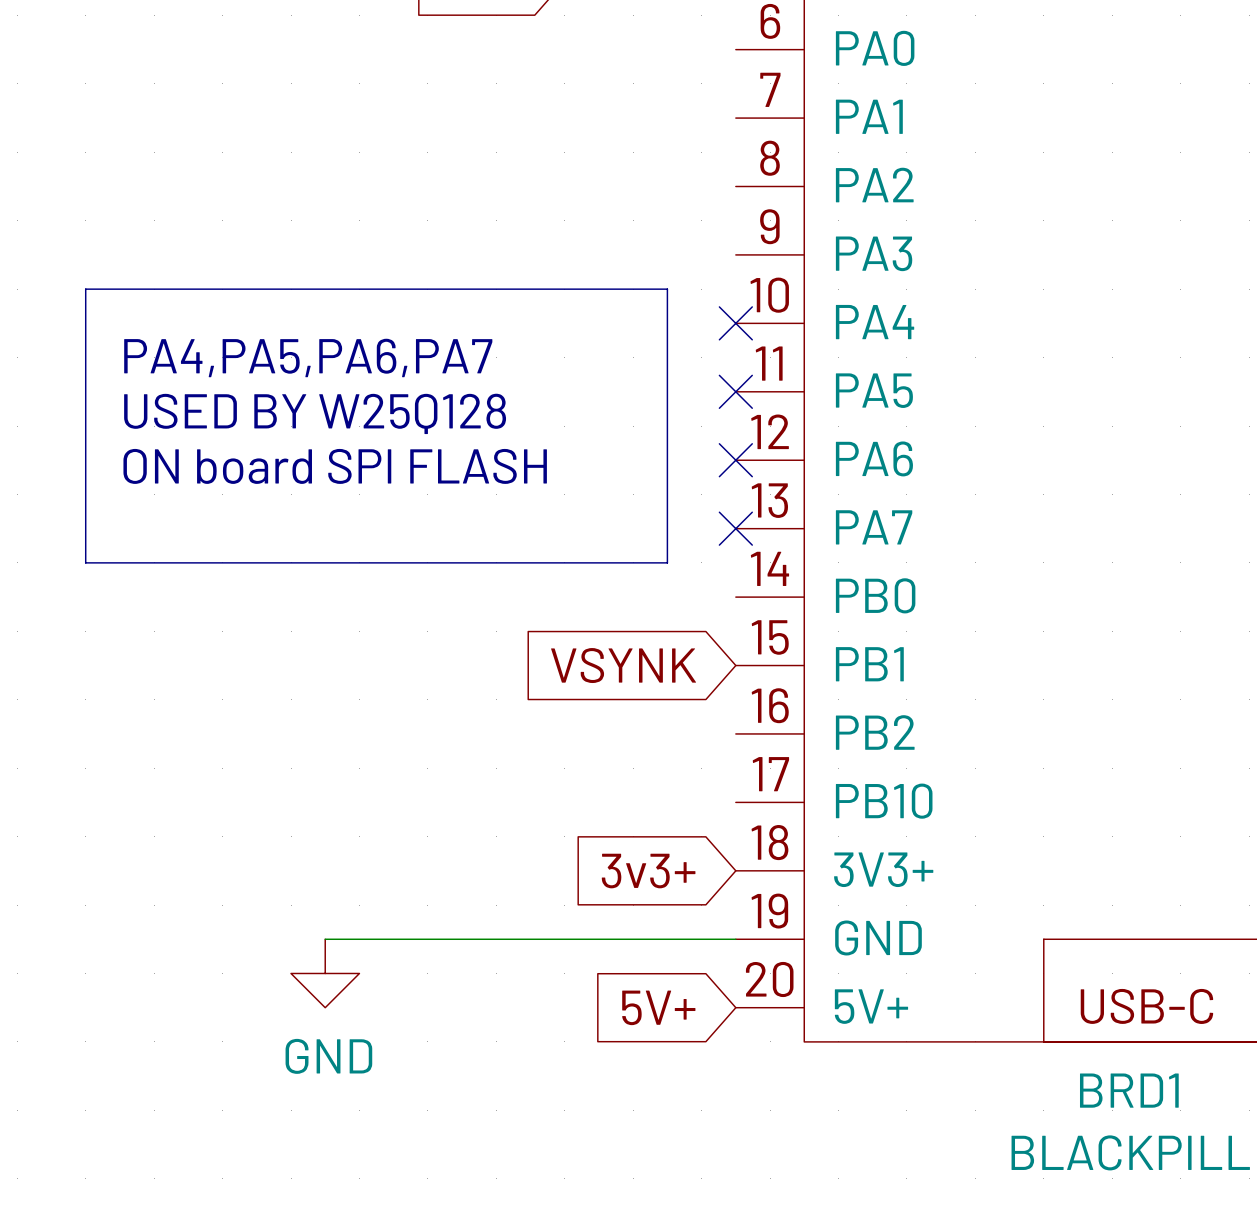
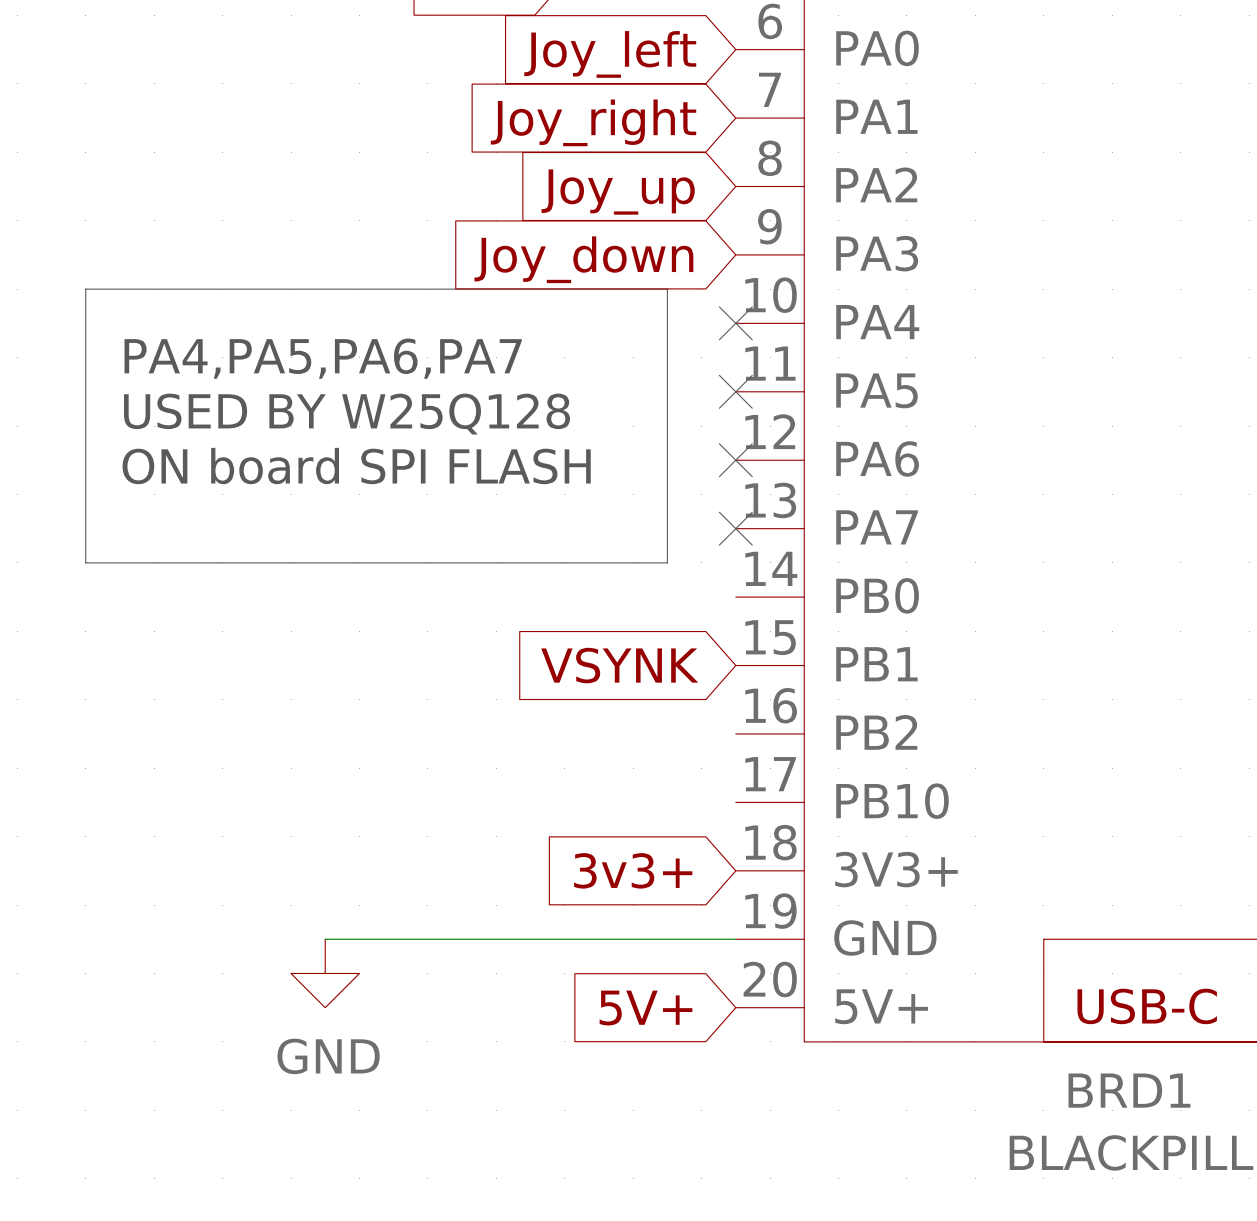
global label: none -> Joy_left (610, 54)
global label: none -> Joy_right (593, 122)
global label: none -> Joy_up (618, 192)
global label: none -> Joy_down (583, 259)

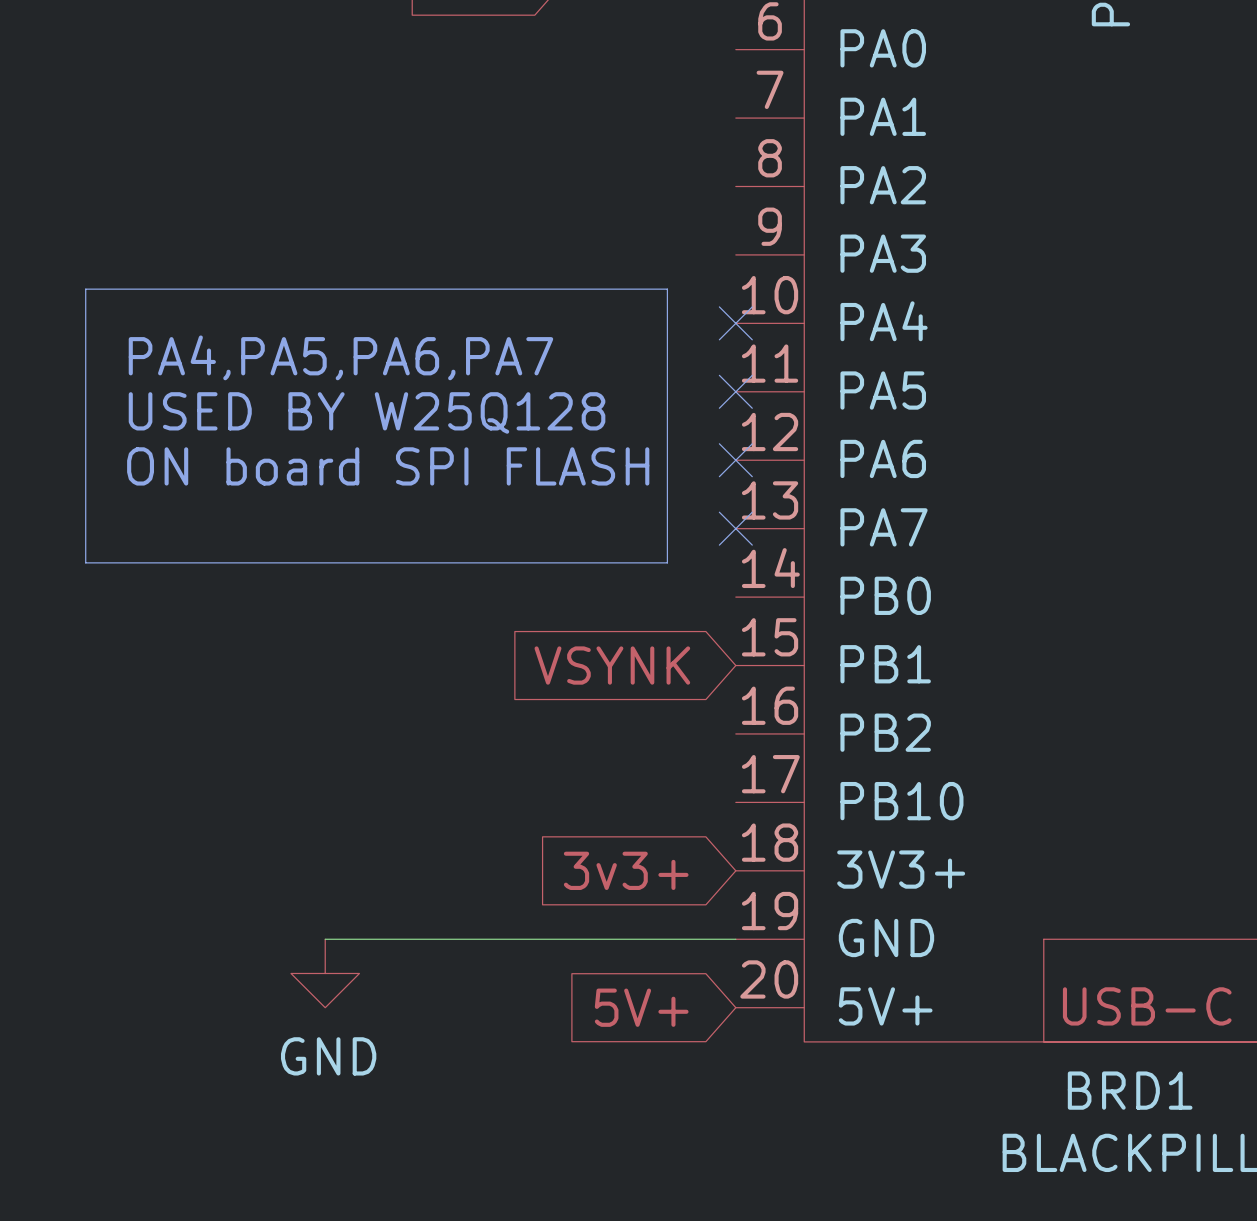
global label: Joy_left (610, 54) -> none
global label: Joy_right (593, 122) -> none
global label: Joy_up (618, 192) -> none
global label: Joy_down (583, 259) -> none

